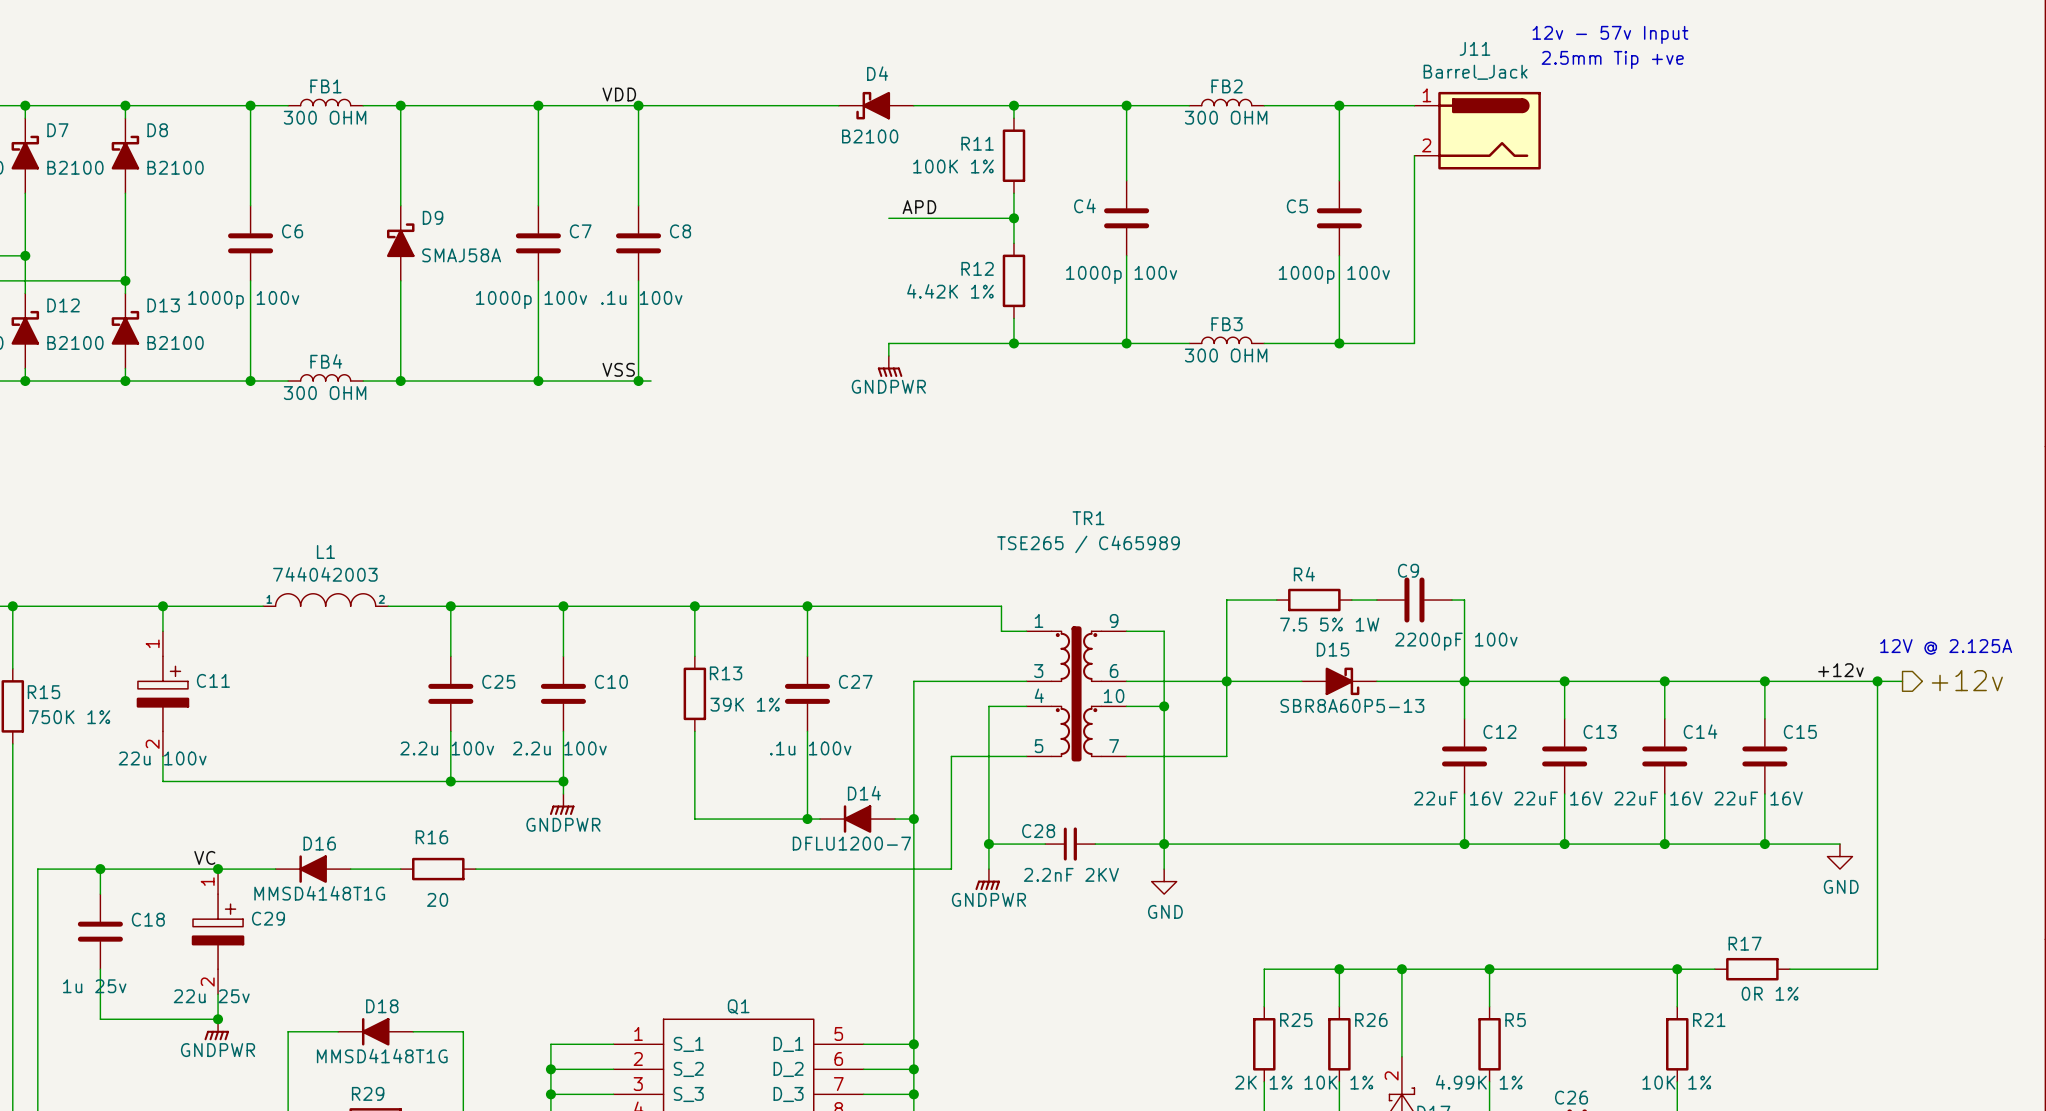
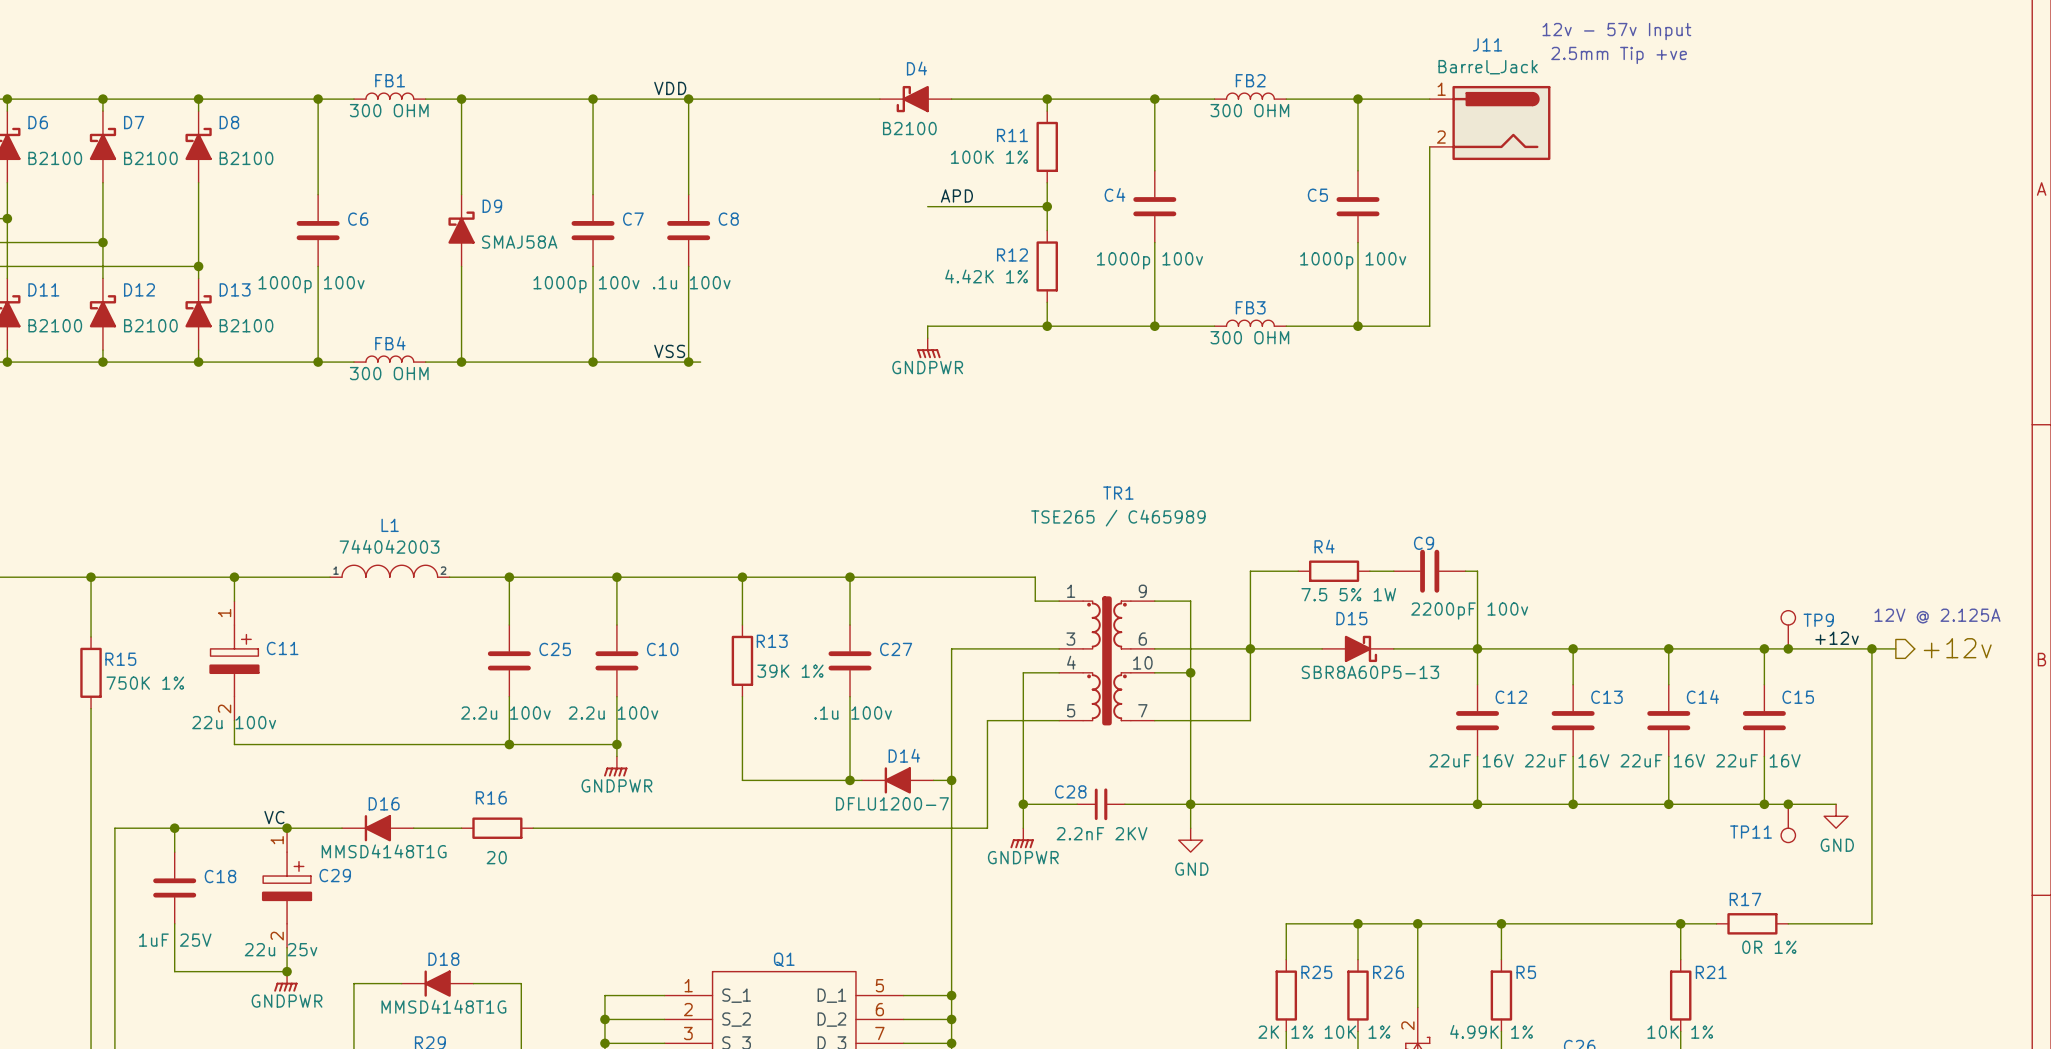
TP9: none -> (1788, 629)
junction: none -> (1788, 648)
junction: none -> (1788, 804)
TP11: none -> (1788, 823)
C18 value: 1u 25v (94, 986) -> 1uF 25V (175, 940)

